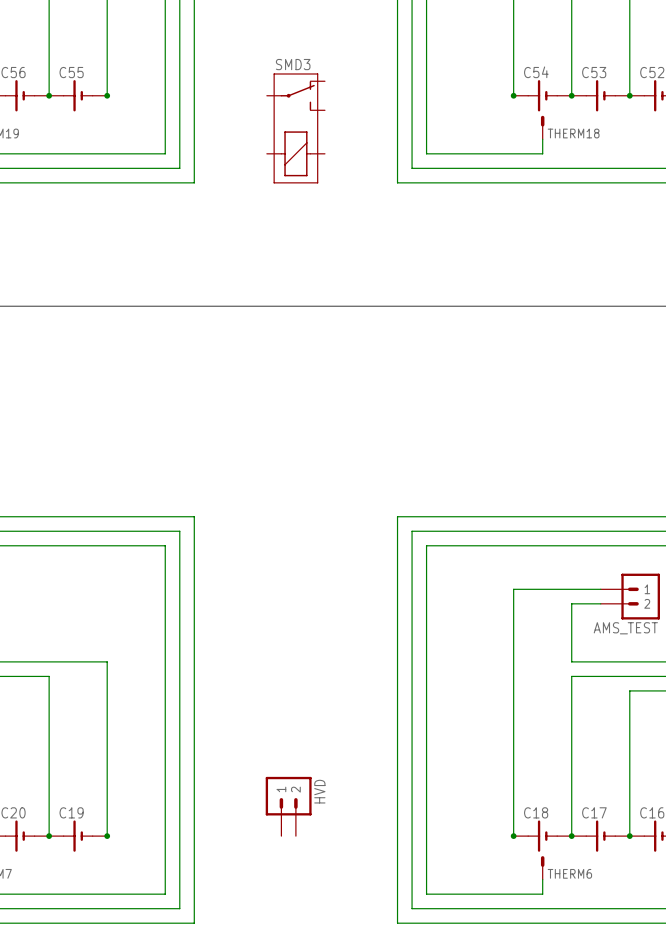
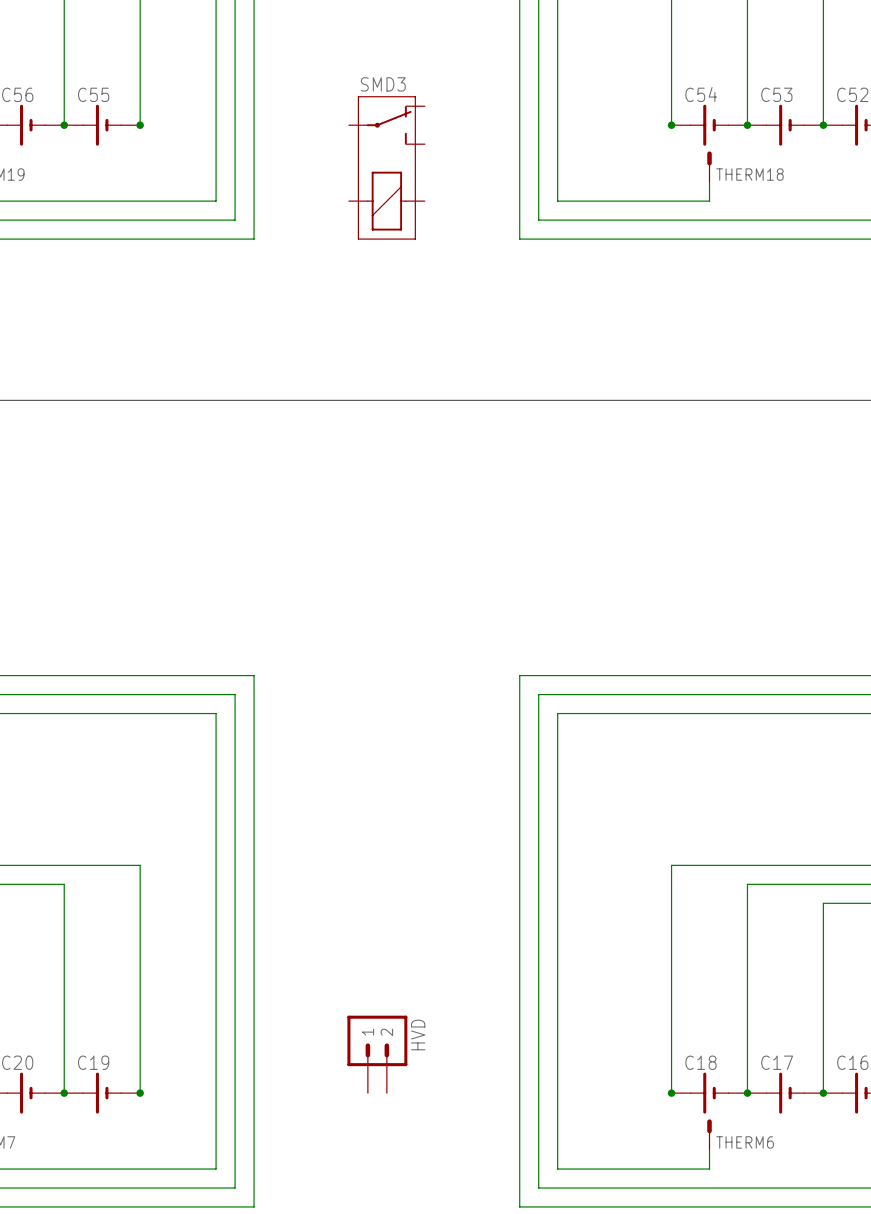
wire: (600, 589) (513, 589) (513, 661) -> (747, 865) (671, 865)
AMS_TEST: (630, 596) -> none
wire: (600, 603) (571, 603) (571, 661) -> none

